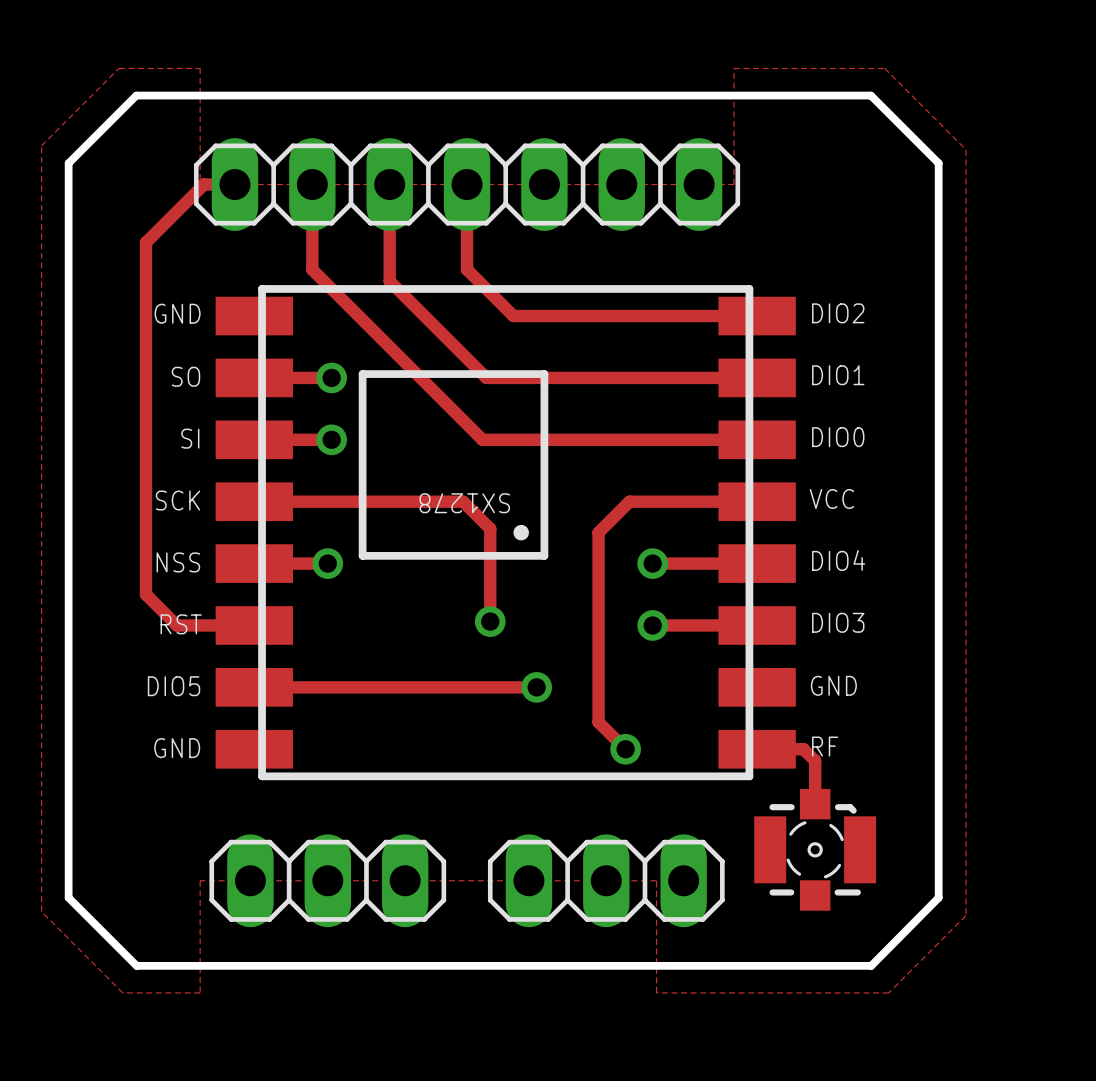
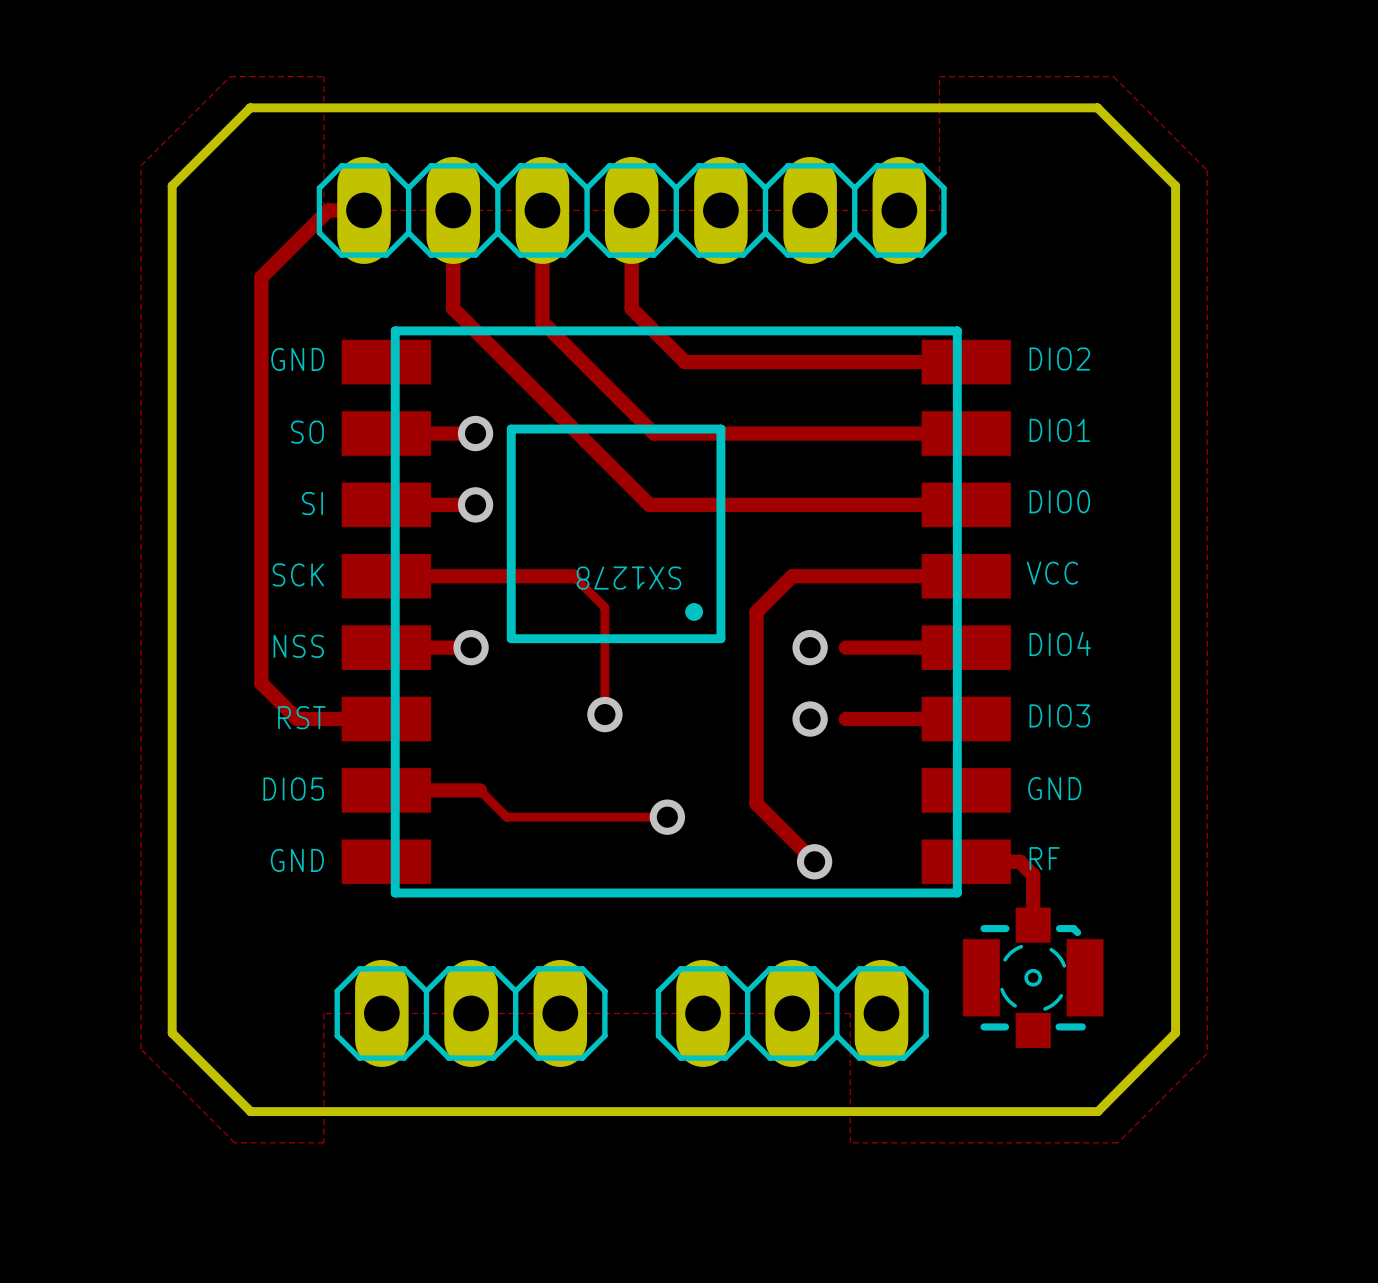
track: (416, 501) (463, 501) (490, 528) (490, 621) -> (573, 576) (604, 607) (604, 714)
track: (629, 501) (598, 532) (598, 722) -> (819, 576) (792, 576) (756, 611) (756, 803) (783, 830)
via position: (652, 563) -> (810, 647)
via: none -> (604, 714)
via: (490, 621) -> none
via position: (652, 625) -> (810, 719)
track: (335, 687) (536, 687) -> (480, 790) (506, 817) (667, 817)
via: (536, 687) -> none
via: none -> (667, 817)

